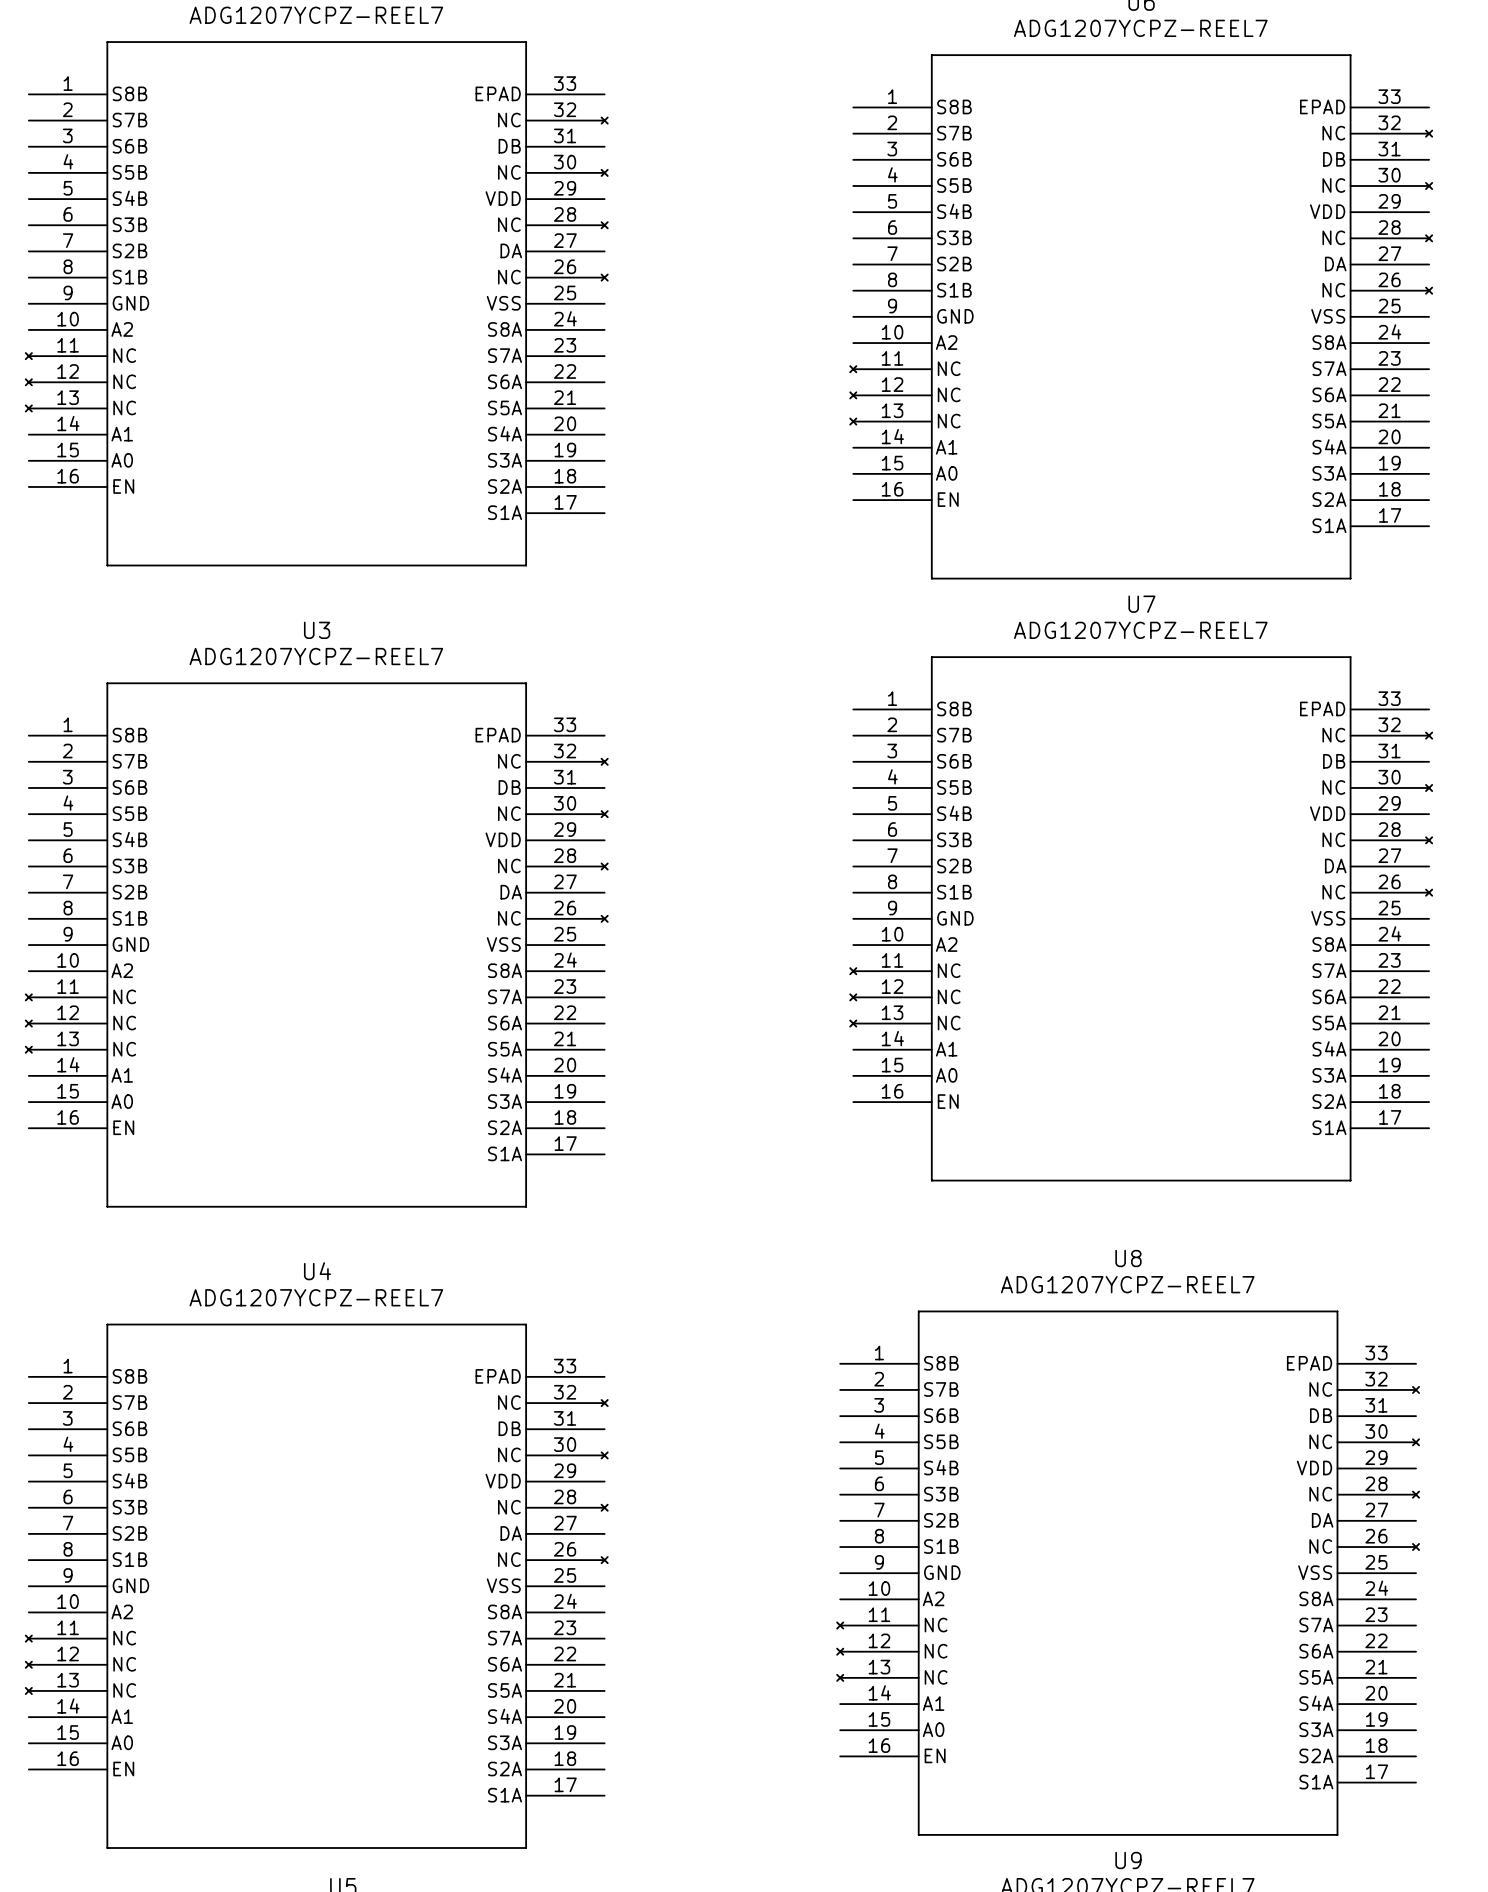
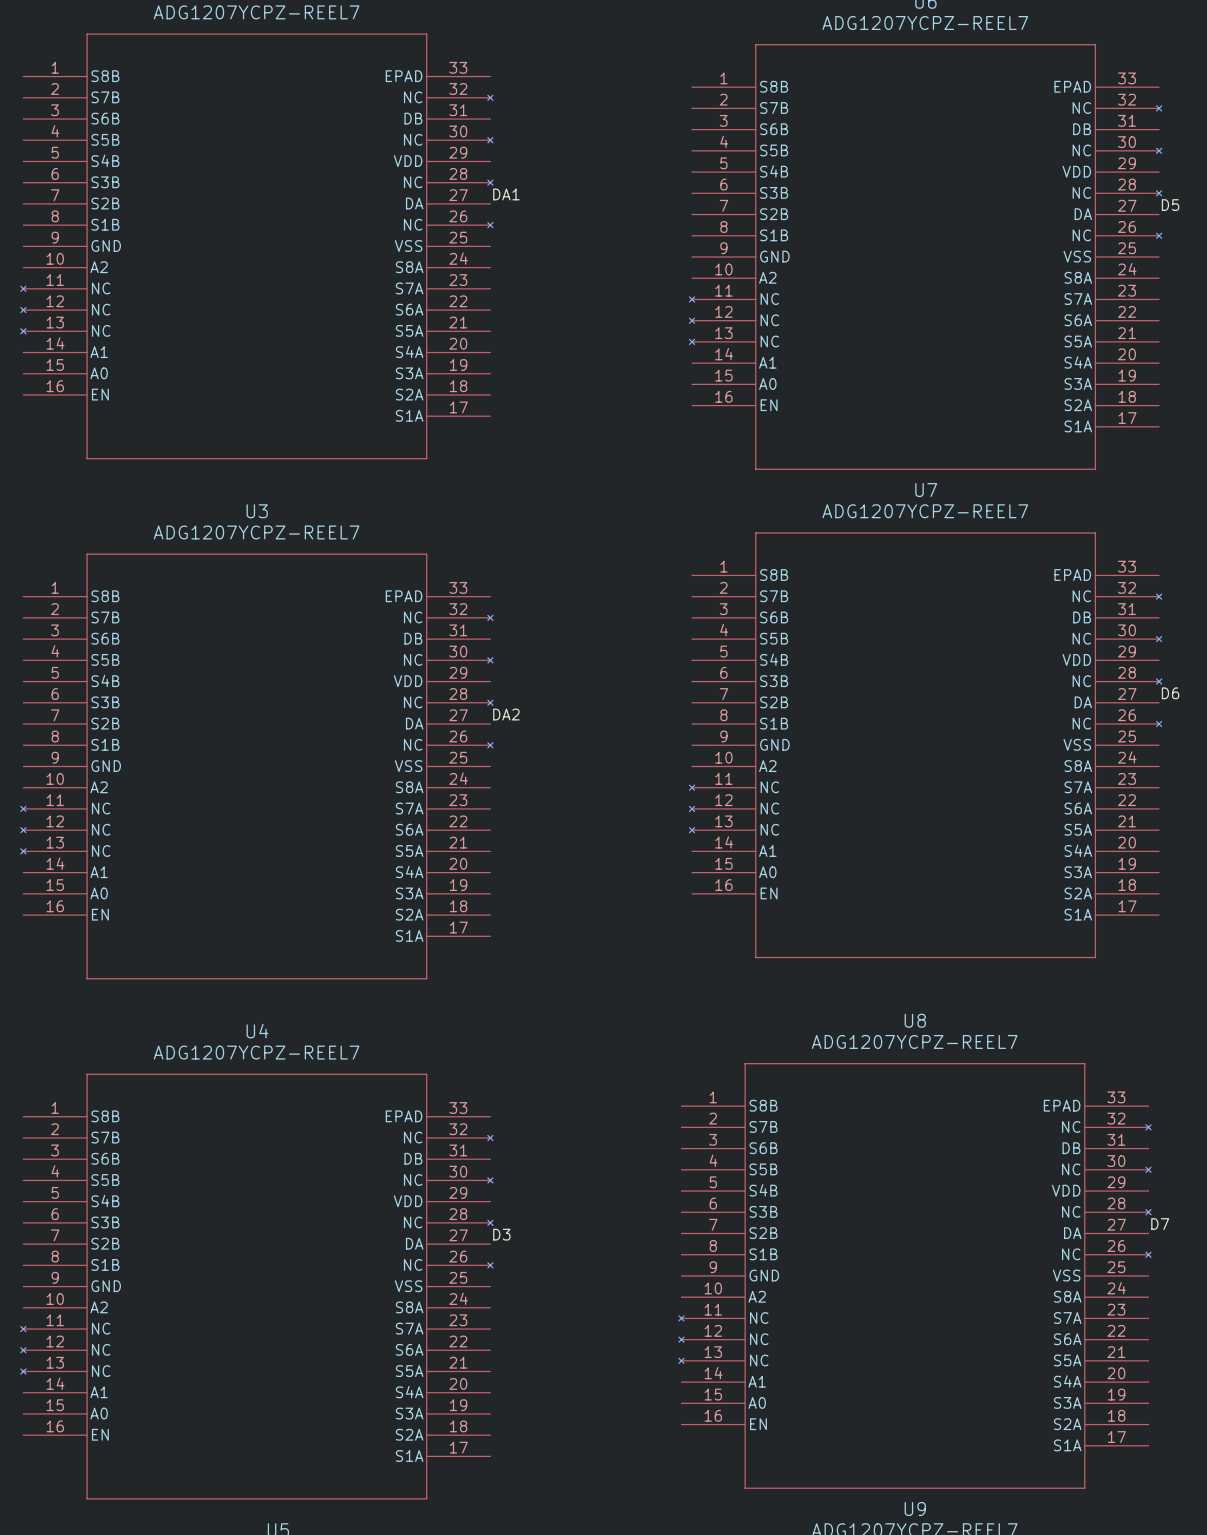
label: none -> DA1 (506, 194)
label: none -> D5 (1170, 205)
label: none -> D6 (1170, 693)
label: none -> DA2 (506, 714)
label: none -> D7 (1160, 1224)
label: none -> D3 (501, 1234)

